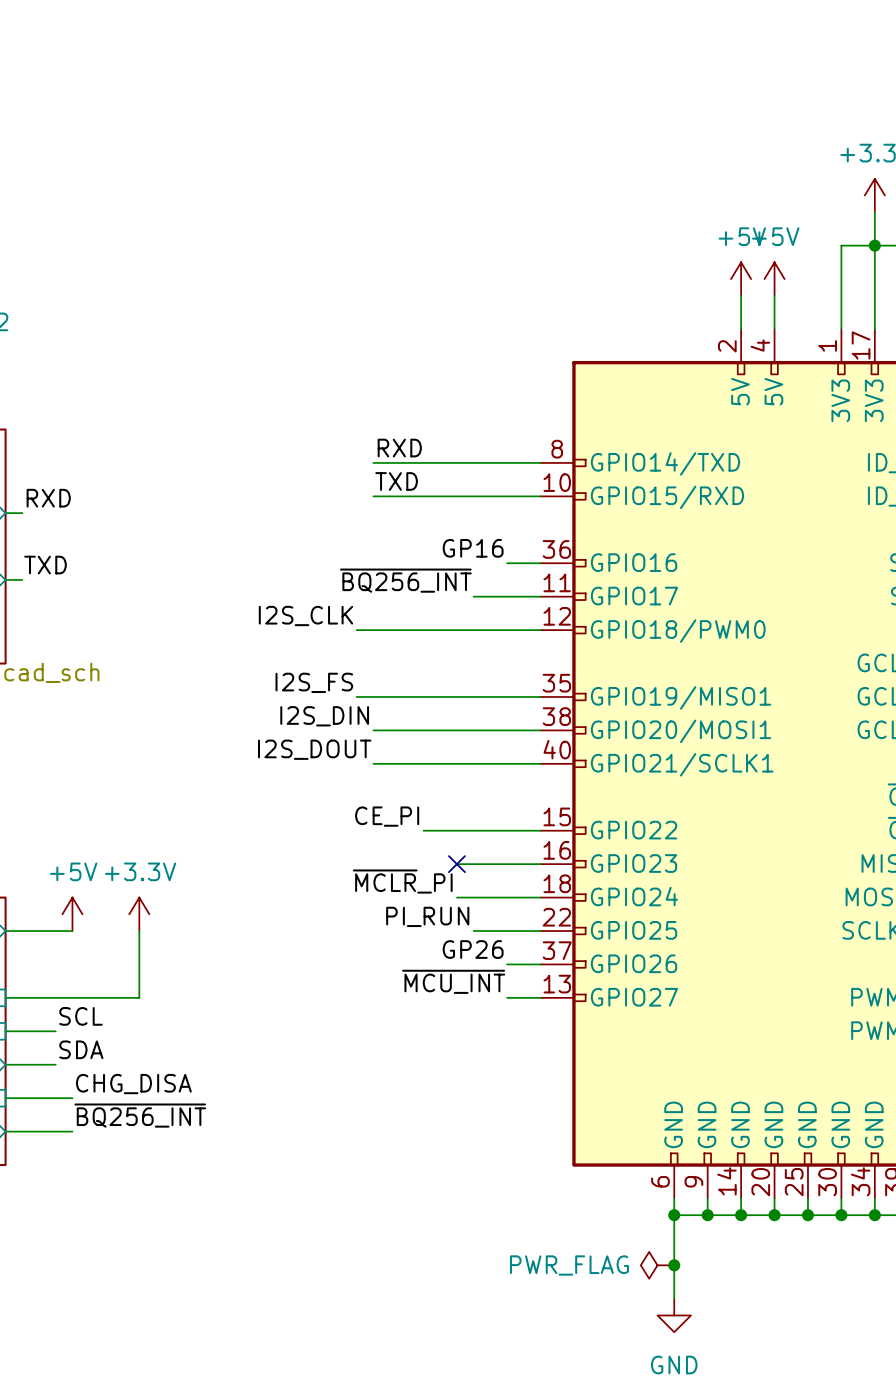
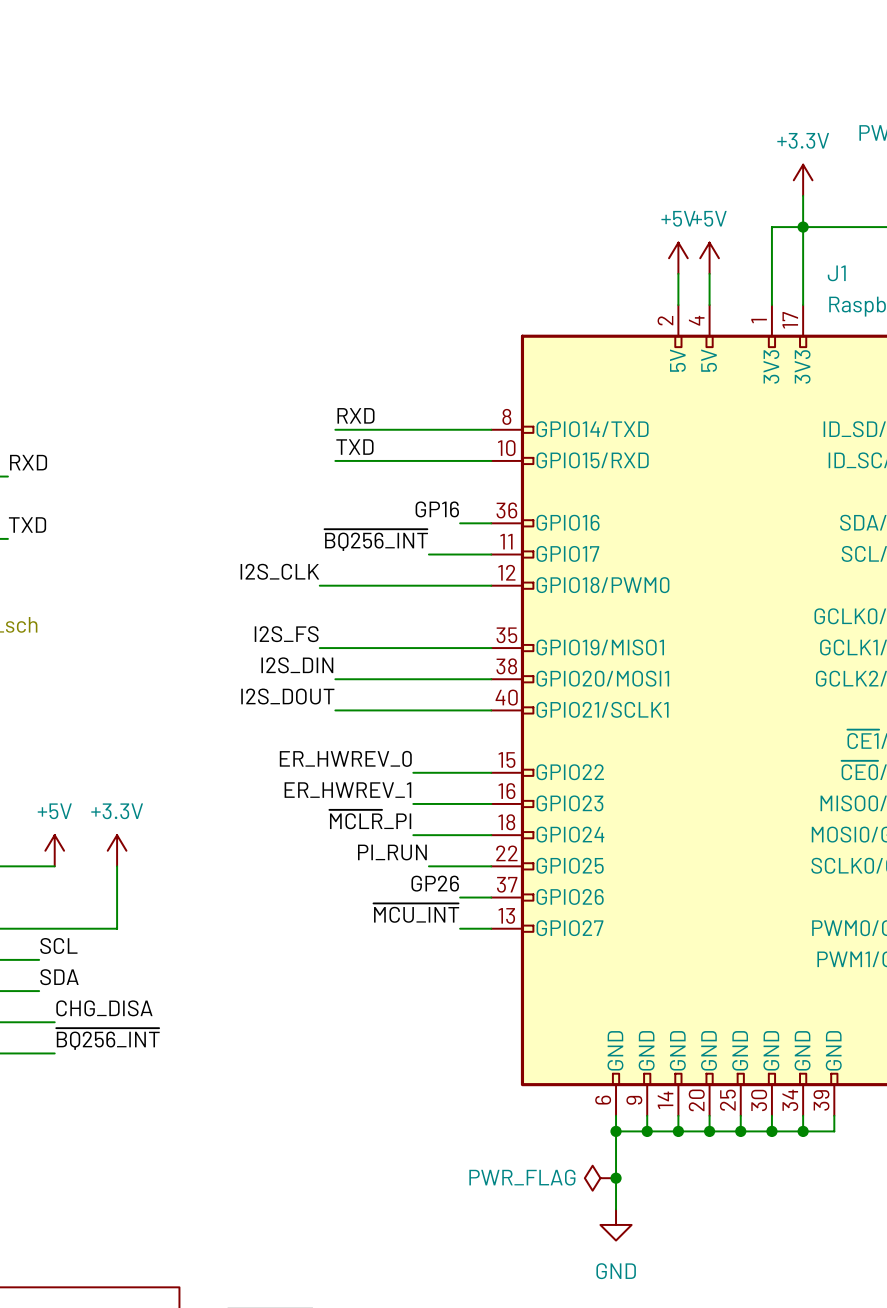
label: none -> ER_HWREV_0 (345, 758)
label: CE_PI (387, 816) -> none
wire: (423, 830) (456, 830) -> none
label: none -> ER_HWREV_1 (347, 790)
no-connect mark: (456, 864) -> none

